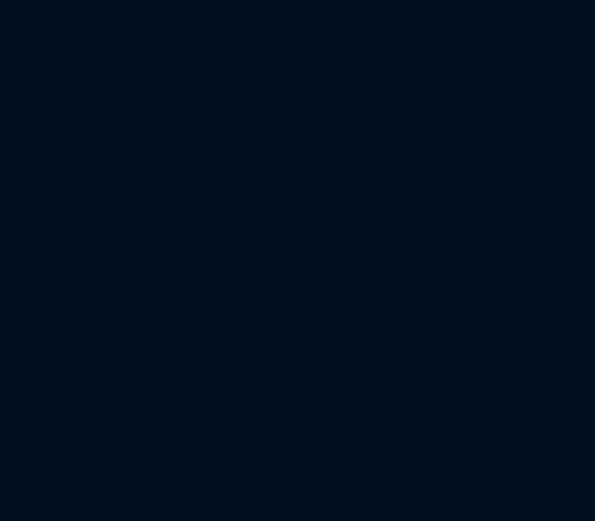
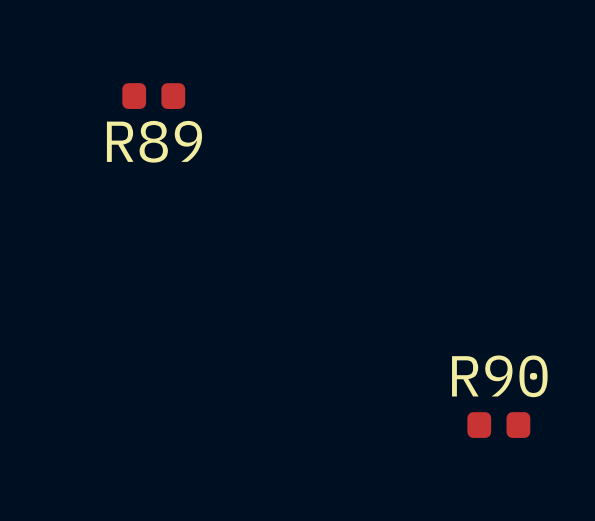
R89: none -> (153, 96)
R90: none -> (498, 425)

